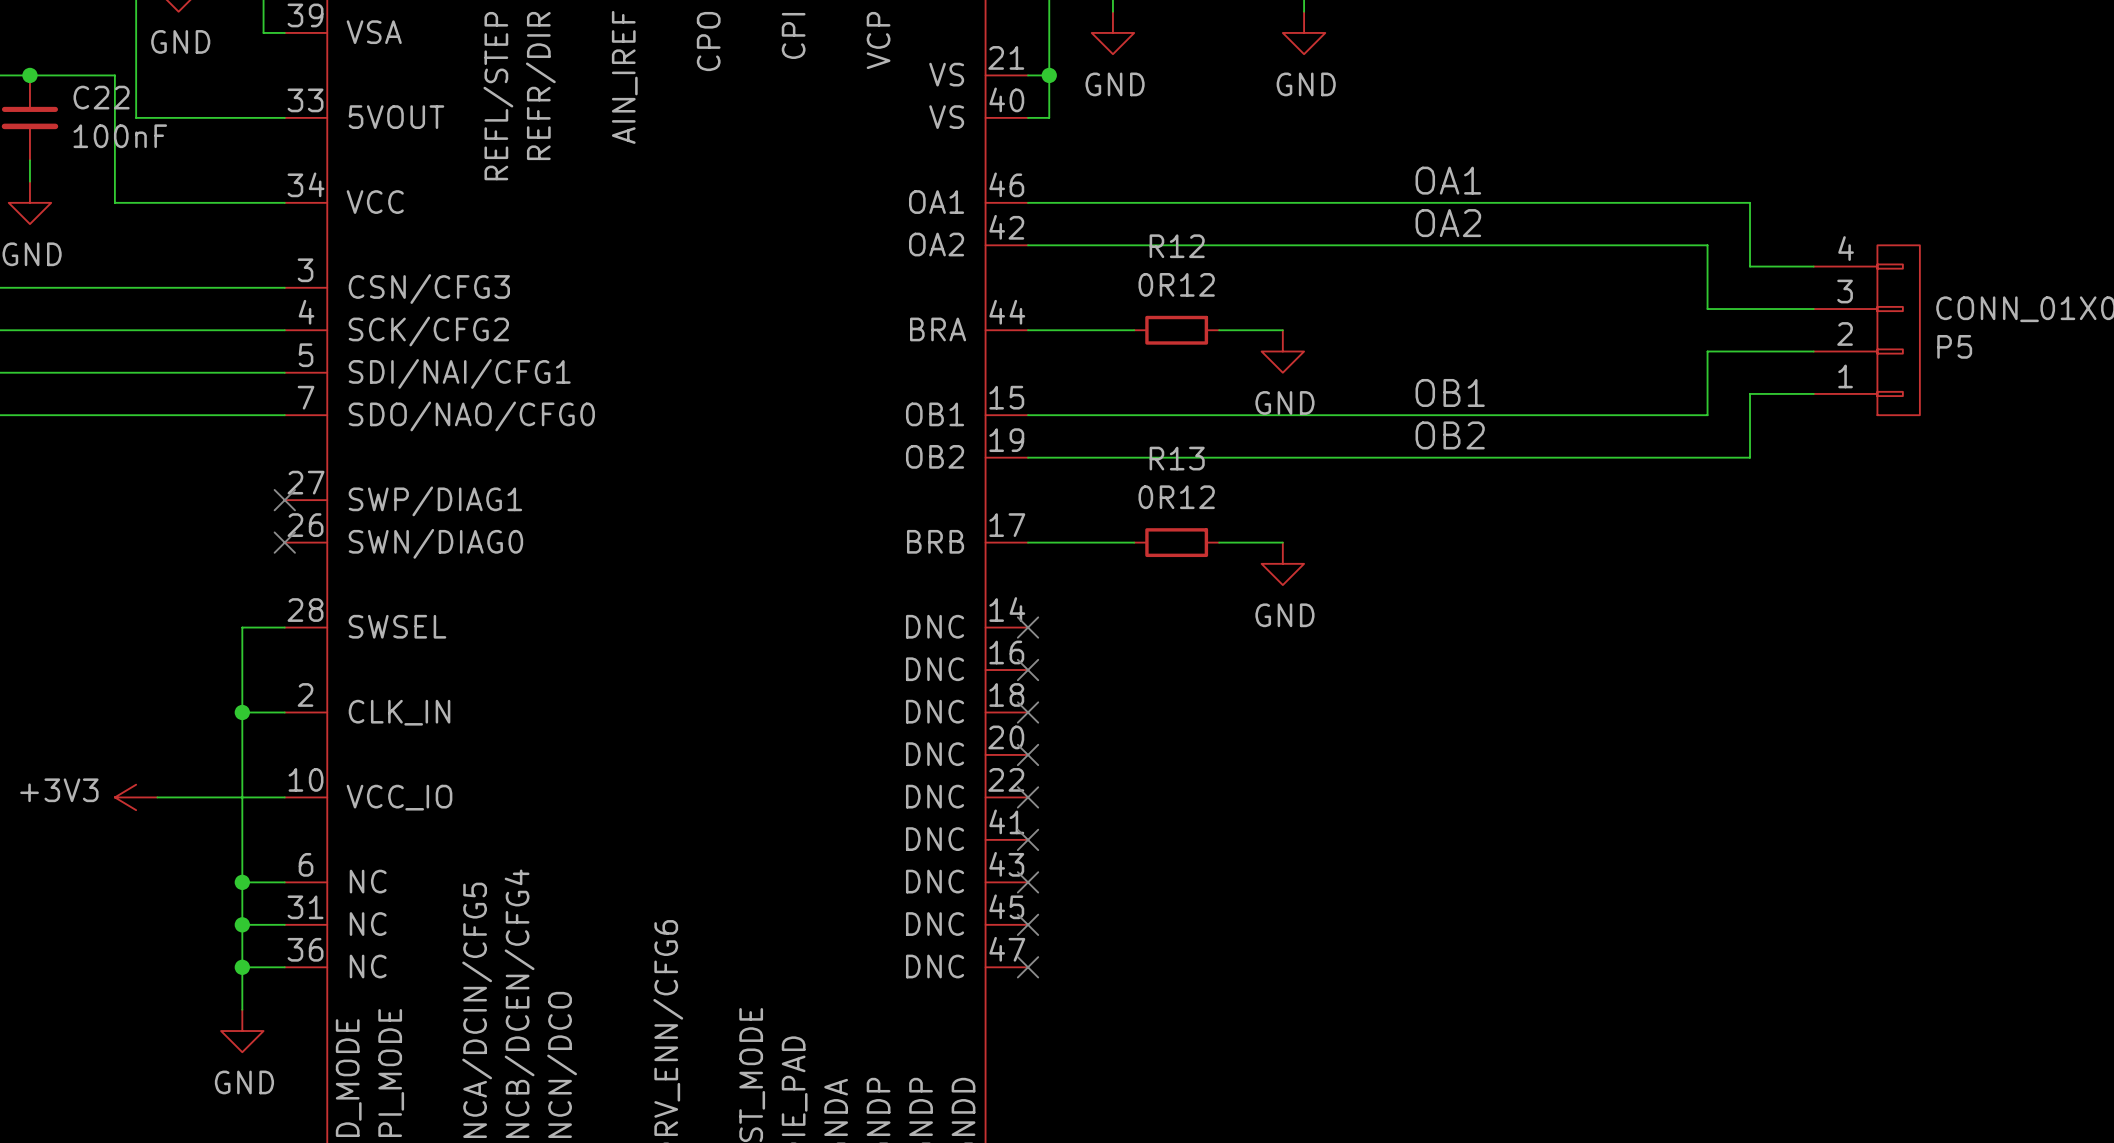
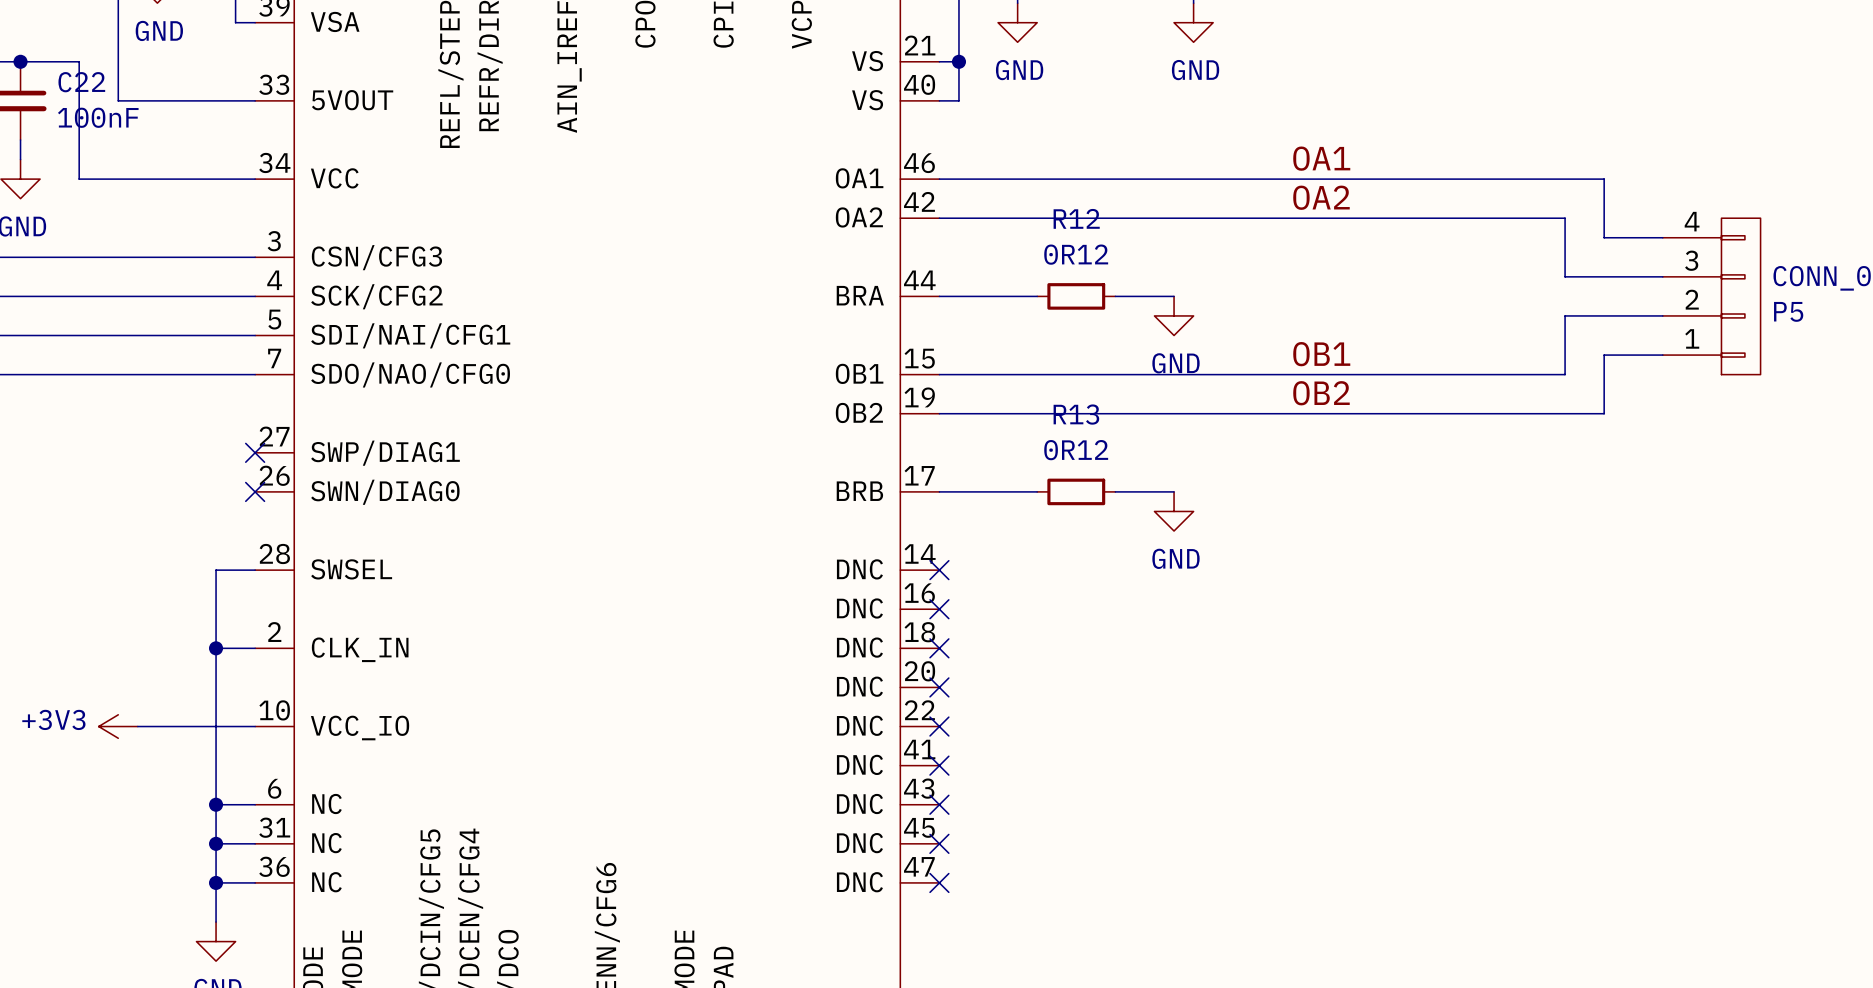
wire: (93, 75) (114, 75) (114, 202) -> (79, 61) (79, 179) (98, 179)

